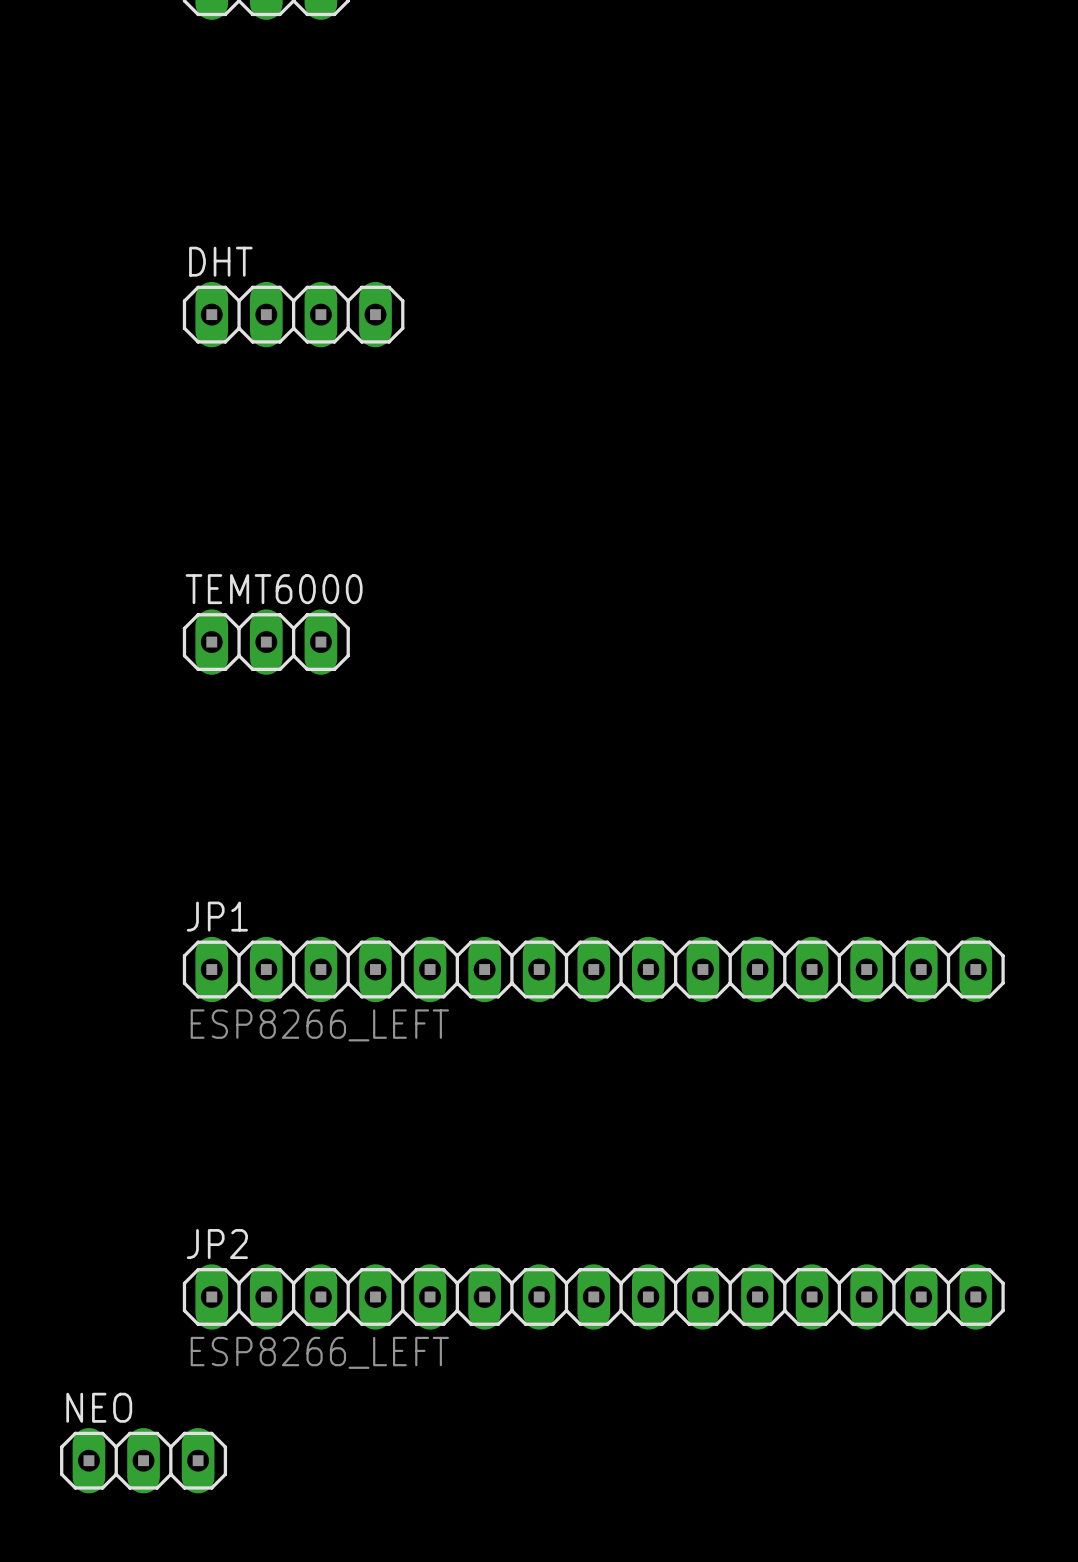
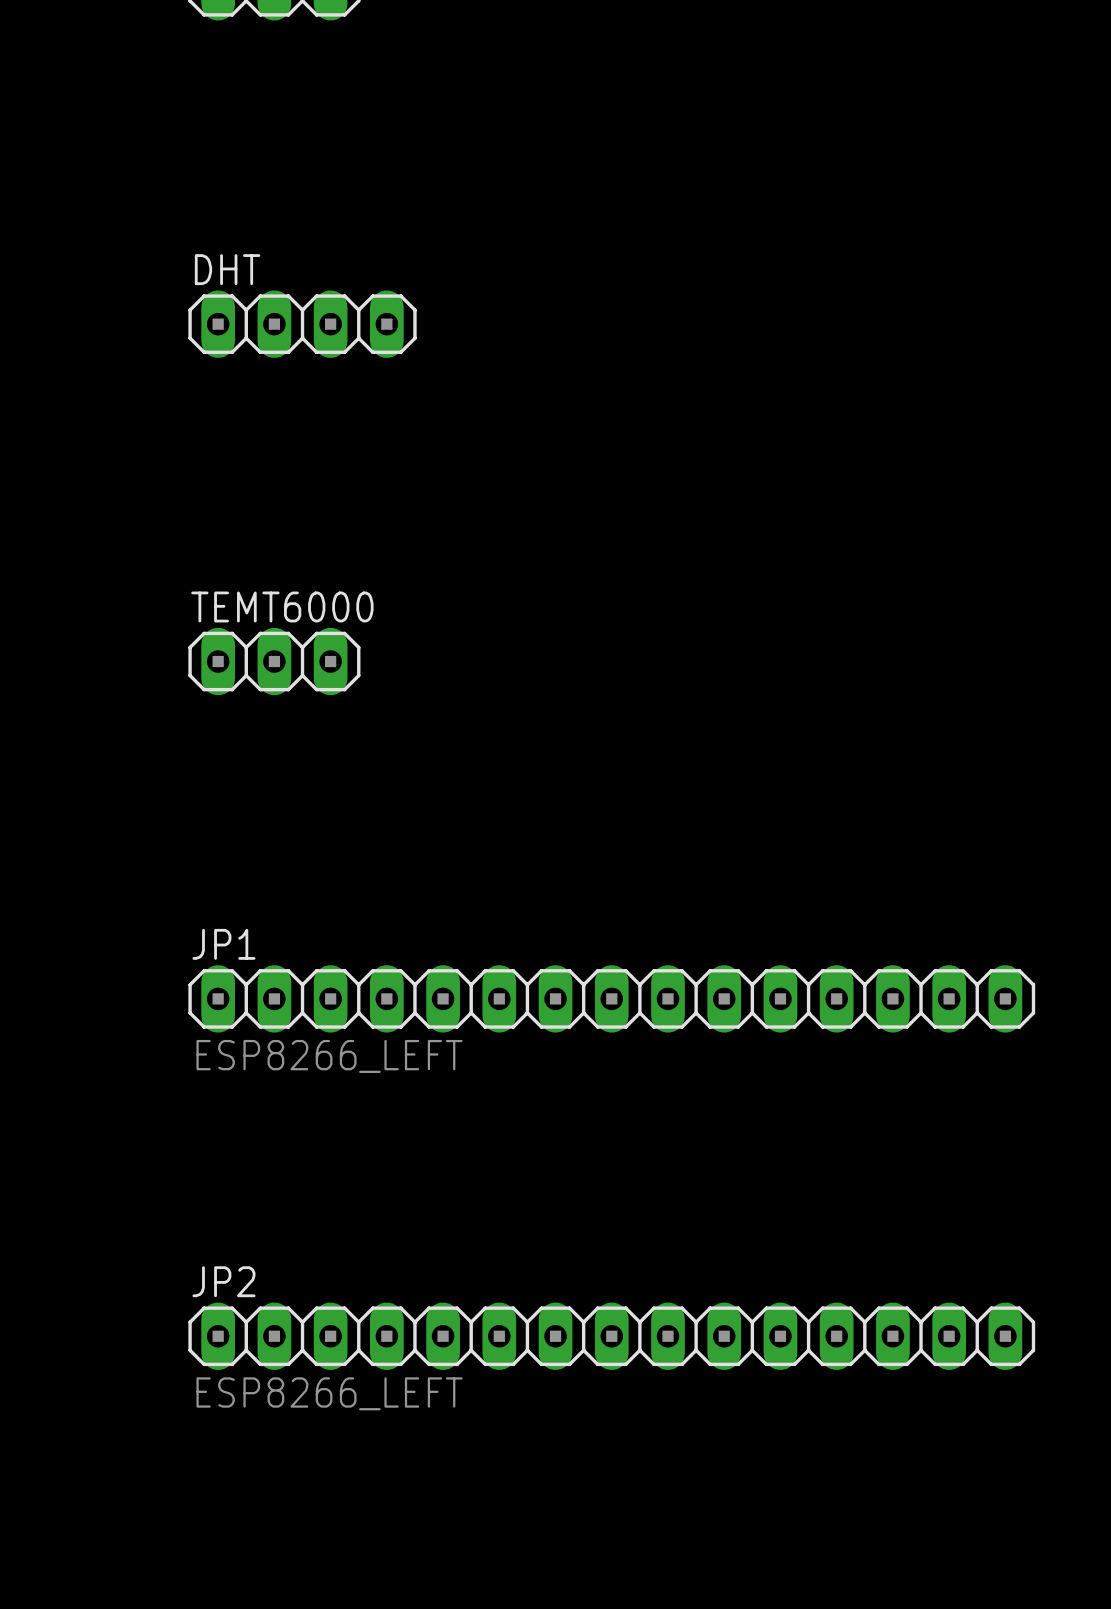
NEO: (143, 1460) -> none

